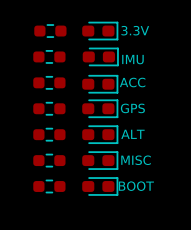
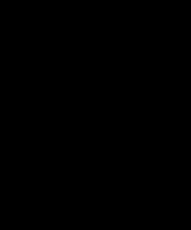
text: 3.3V (135, 30) -> none
part: (50, 31) -> none
part: (100, 31) -> none
part: (49, 56) -> none
part: (100, 56) -> none
text: IMU (132, 59) -> none
part: (49, 82) -> none
text: ACC (132, 82) -> none
part: (100, 84) -> none
part: (49, 108) -> none
part: (100, 108) -> none
text: GPS (132, 108) -> none
part: (49, 134) -> none
part: (100, 134) -> none
text: ALT (132, 134) -> none
part: (49, 160) -> none
part: (100, 160) -> none
text: MISC (136, 160) -> none
part: (49, 186) -> none
part: (100, 186) -> none
text: BOOT (136, 186) -> none

